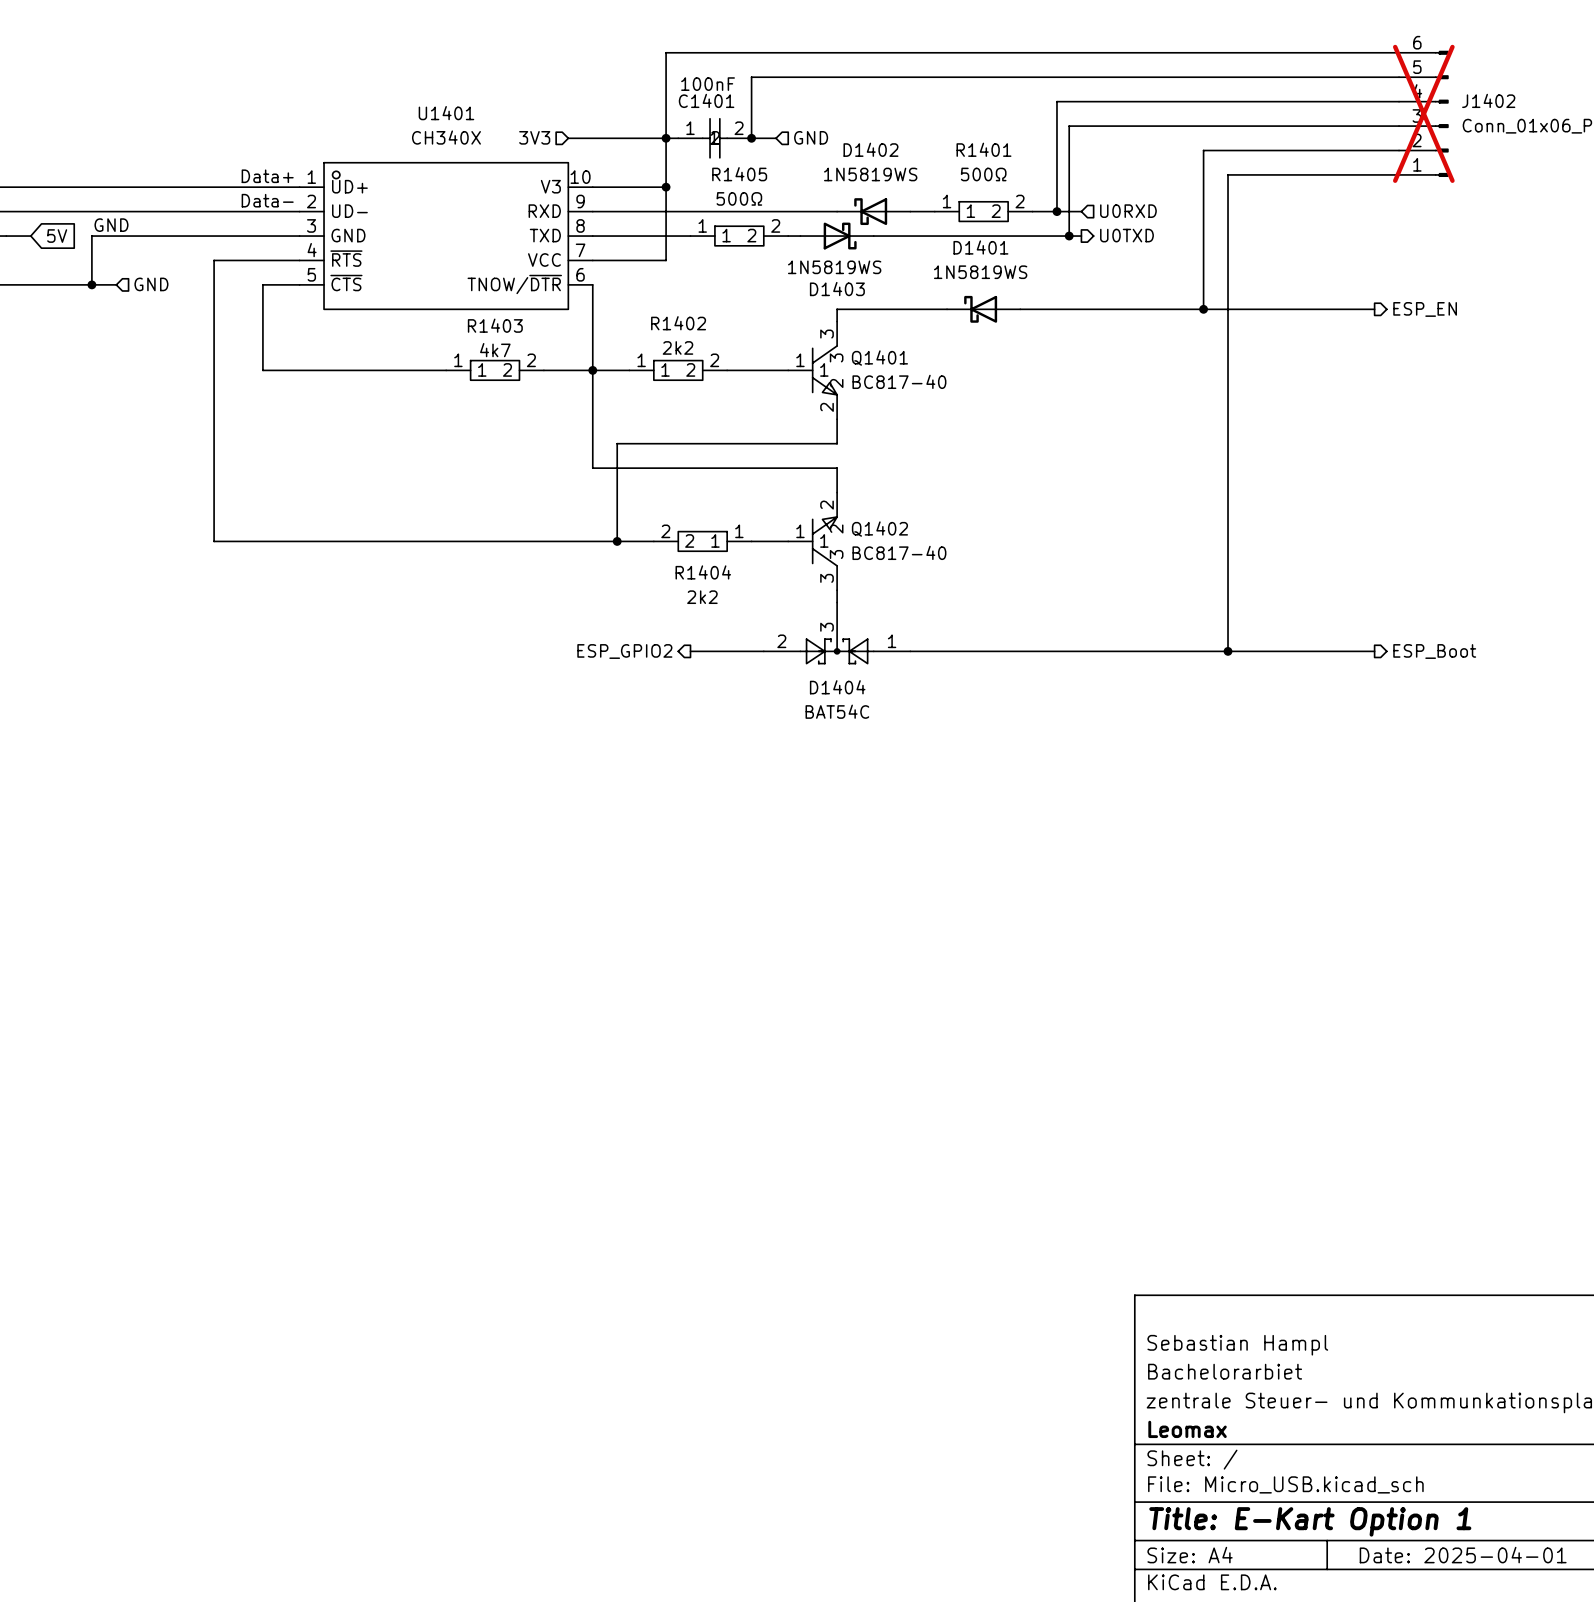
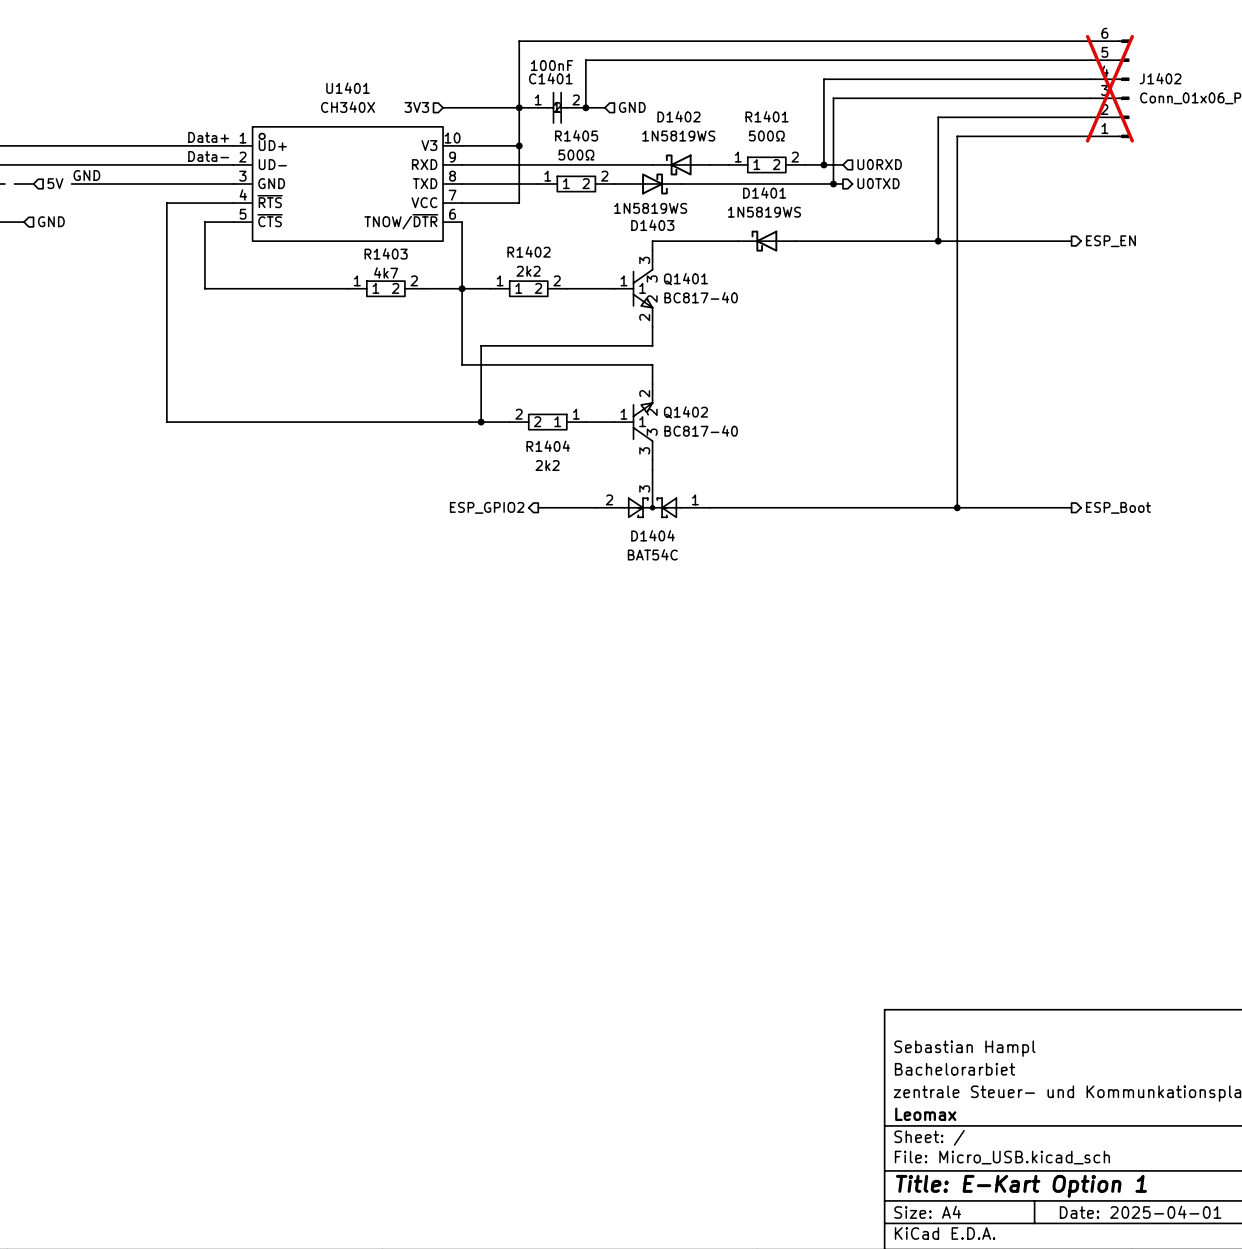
hierarchical label: none -> 5V (55, 183)
wire: (6, 236) (18, 236) -> (24, 183) (33, 183)
global label: 5V (57, 236) -> none
wire: (91, 236) (91, 284) -> none
wire: (30, 284) (116, 284) -> none
junction: (91, 284) -> none
hierarchical label position: GND (151, 284) -> GND (51, 221)

